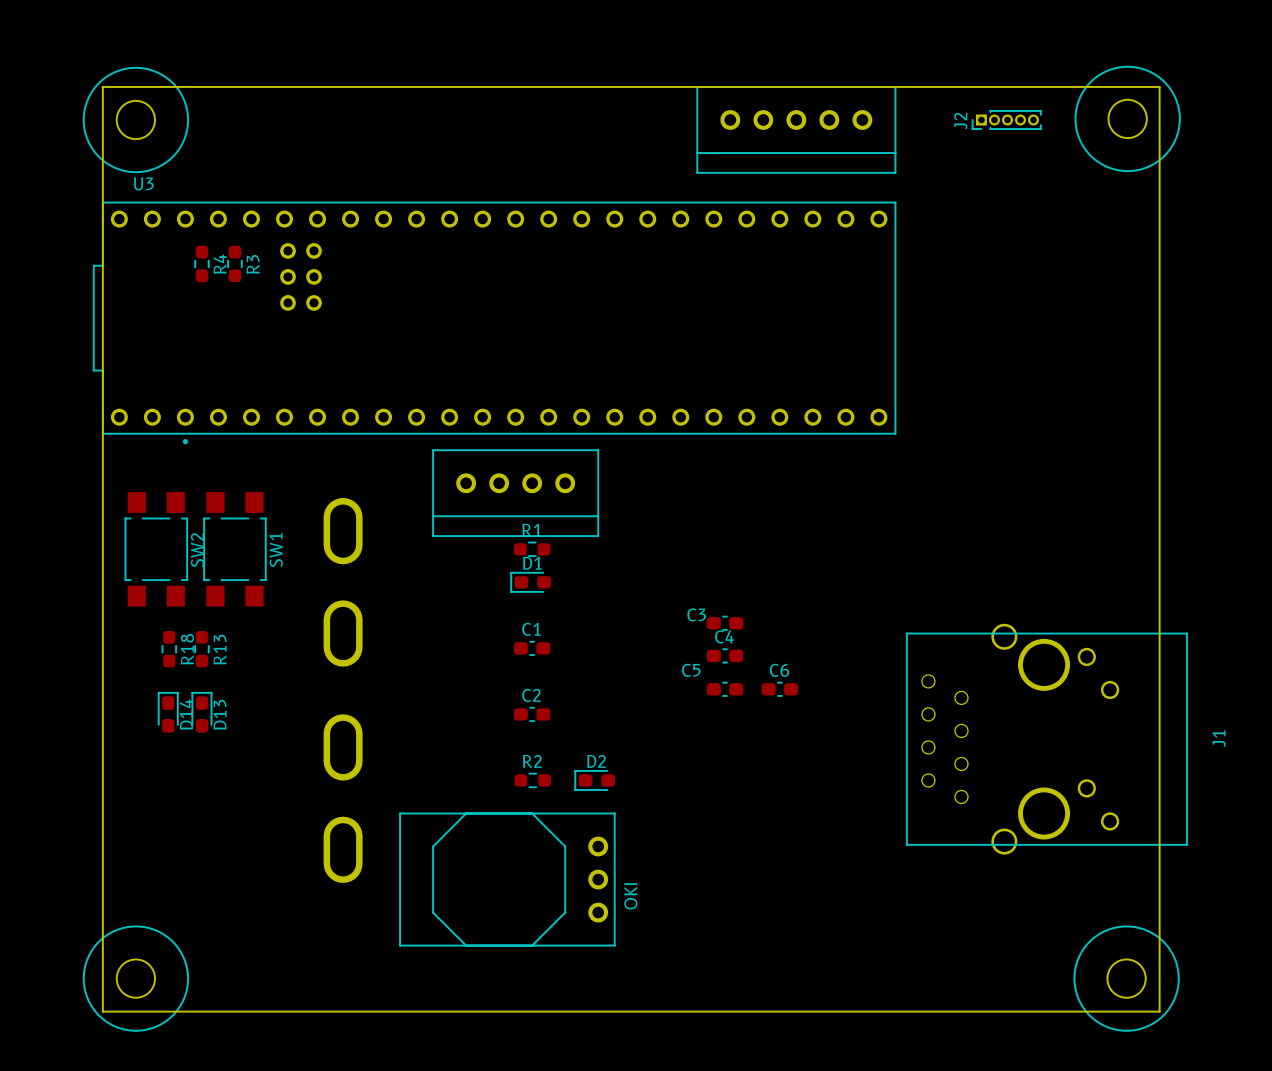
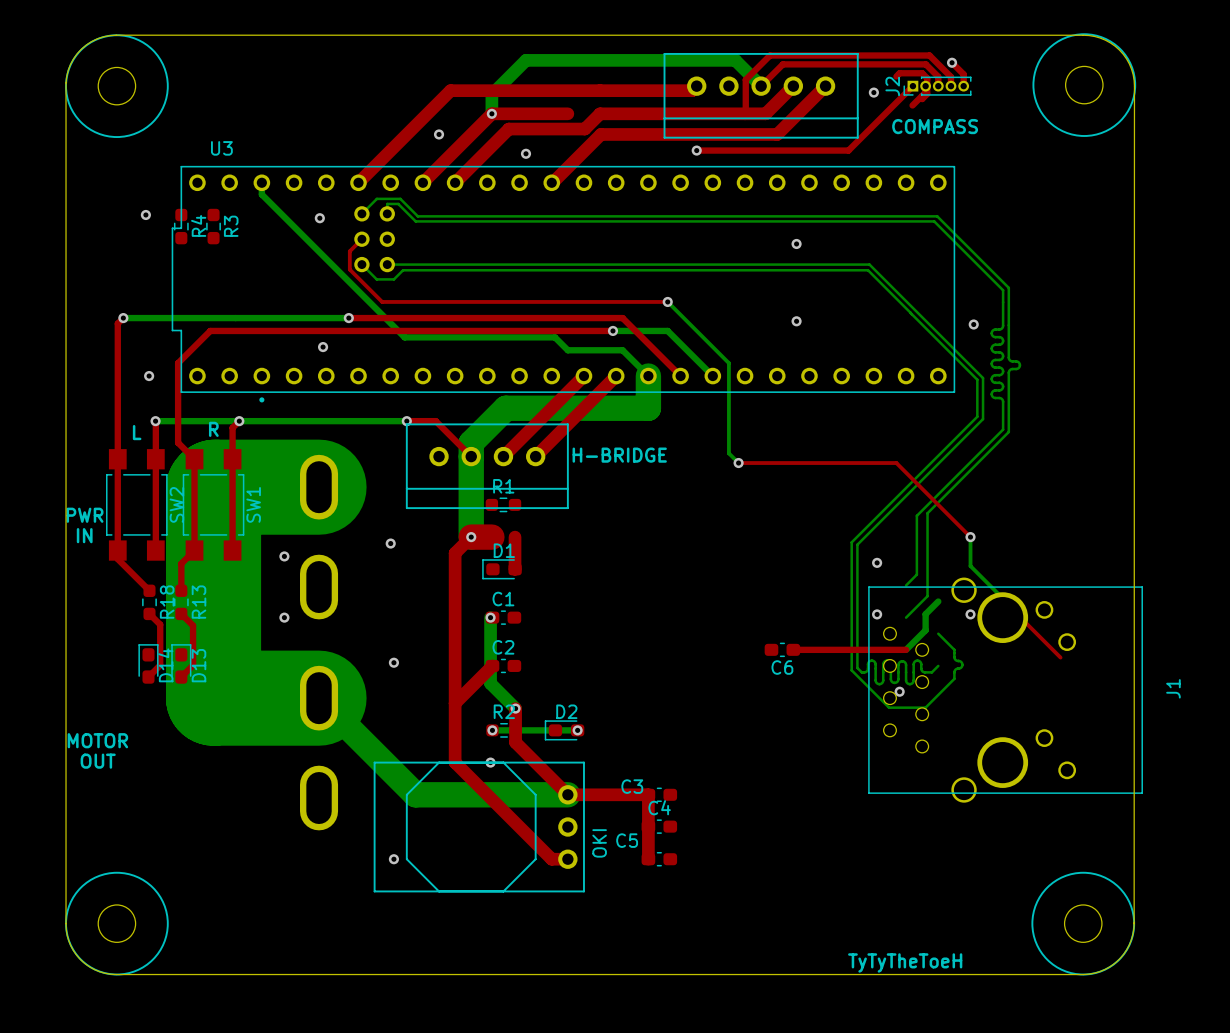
board edge: (102, 86) (1159, 86) (1159, 1011) (102, 1011) (102, 86) -> none
top track: none -> (952, 62) (963, 74) (963, 86)
via: none -> (952, 62)
top track: none -> (896, 76) (899, 73) (922, 73) (927, 78) (927, 94) (922, 99) (922, 95)
top track: none -> (696, 86) (692, 90) (450, 90) (358, 182)
top track: none -> (761, 86) (782, 64) (925, 64) (938, 76) (938, 86)
bottom track: none -> (761, 86) (735, 60) (526, 60) (491, 94) (491, 113)
top track: none -> (825, 86) (777, 134) (600, 134) (551, 182)
top track: none -> (912, 86) (848, 150) (696, 150)
top track: none -> (925, 86) (925, 92) (912, 105)
top track: none -> (950, 86) (950, 76) (929, 55) (770, 55) (745, 79) (745, 113)
J2 position: (1006, 120) -> (937, 86)
via: none -> (873, 92)
top track: none -> (777, 101) (793, 86) (765, 113) (600, 113) (584, 129) (508, 129) (455, 182)
via: none -> (491, 113)
top track: none -> (567, 113) (491, 113) (422, 182)
text: none -> COMPASS (935, 126)
via: none -> (439, 134)
via: none -> (696, 150)
via: none -> (526, 153)
bottom track: none -> (261, 182) (261, 194) (404, 337) (554, 337) (567, 350) (622, 350) (648, 376) (648, 408) (505, 408) (471, 442) (471, 537)
bottom track: none -> (361, 213) (376, 198) (400, 198) (417, 216) (937, 216) (1008, 287) (1008, 358) (1011, 361) (1018, 362) (1019, 365) (1008, 372) (1008, 431) (927, 513) (927, 596) (906, 617)
bottom track: none -> (387, 213) (387, 203) (398, 203) (415, 221) (934, 221) (1003, 290) (1002, 326) (1000, 329) (993, 330) (991, 333) (993, 336) (1000, 337) (1003, 340) (1001, 343) (994, 345) (991, 348) (993, 351) (1000, 352) (1002, 355) (1001, 359) (994, 360) (991, 363) (994, 367) (1001, 368) (1002, 372) (993, 375) (991, 378) (994, 382) (1001, 383) (1002, 387) (1000, 390) (993, 390) (991, 394) (993, 397) (1000, 398) (1002, 400) (1003, 429) (916, 515) (916, 574) (906, 585)
via: none -> (145, 214)
via: none -> (319, 218)
top track: none -> (361, 239) (349, 251) (349, 269) (382, 301) (667, 301)
via: none -> (796, 243)
bottom track: none -> (361, 264) (376, 279) (393, 279) (403, 270) (868, 270) (910, 312)
bottom track: none -> (387, 264) (869, 264) (983, 378) (983, 419) (857, 544) (857, 667) (861, 672) (865, 672) (868, 662) (874, 661) (875, 681) (880, 684) (883, 680) (883, 662) (888, 660) (890, 663) (890, 680) (895, 682) (898, 679) (898, 663) (903, 661) (906, 664) (906, 681) (909, 684) (913, 681) (913, 663) (915, 661) (920, 662) (921, 670) (924, 672) (931, 672) (938, 665)
U3 position: (494, 322) -> (563, 284)
bottom track: none -> (667, 301) (728, 363) (728, 453) (738, 463)
via: none -> (667, 301)
bottom track: none -> (910, 312) (977, 379) (977, 416) (851, 542) (851, 670) (889, 707) (925, 707) (954, 678) (954, 670) (962, 665) (960, 661) (954, 659) (954, 649) (938, 633)
top track: none -> (123, 318) (117, 323) (117, 559) (149, 590)
bottom track: none -> (123, 318) (348, 318)
via: none -> (123, 318)
top track: none -> (348, 318) (622, 318) (680, 376)
via: none -> (348, 318)
via: none -> (796, 321)
via: none -> (973, 324)
top track: none -> (612, 330) (210, 330) (178, 363) (178, 442) (194, 459) (194, 550) (181, 563) (181, 590)
bottom track: none -> (612, 330) (667, 330) (712, 376)
via: none -> (612, 330)
via: none -> (323, 347)
via: none -> (149, 376)
top track: none -> (583, 376) (503, 456)
top track: none -> (616, 376) (535, 456)
top track: none -> (155, 421) (155, 550)
bottom track: none -> (155, 421) (406, 421)
via: none -> (155, 421)
top track: none -> (239, 421) (232, 427) (232, 550)
via: none -> (239, 421)
top track: none -> (406, 421) (435, 421) (471, 456)
via: none -> (406, 421)
text: none -> R (213, 429)
text: none -> L (137, 432)
part position: (515, 493) -> (487, 466)
text: none -> H-BRIDGE (619, 455)
top track: none -> (738, 463) (896, 463) (970, 537)
via: none -> (738, 463)
bottom track: none -> (319, 487) (215, 487) (213, 488) (213, 698) (319, 698) (415, 794) (567, 794)
text: none -> PWR (85, 515)
text: none -> IN (84, 535)
via: none -> (471, 537)
top track: none -> (491, 537) (471, 537) (455, 553) (455, 762) (551, 859) (567, 859)
D1 position: (530, 582) -> (501, 569)
top track: none -> (515, 537) (515, 569)
bottom track: none -> (970, 537) (970, 566) (1005, 601)
via: none -> (970, 537)
via: none -> (390, 543)
via: none -> (284, 556)
via: none -> (877, 562)
C3 position: (725, 623) -> (659, 794)
C1 position: (532, 648) -> (503, 617)
bottom track: none -> (938, 601) (925, 614) (925, 630) (906, 649)
top track: none -> (1005, 601) (1060, 657)
C4 position: (725, 655) -> (659, 826)
top track: none -> (149, 613) (160, 624) (160, 665) (148, 677)
top track: none -> (181, 613) (193, 625) (193, 665) (181, 677)
via: none -> (877, 614)
via: none -> (970, 614)
via: none -> (284, 617)
bottom track: none -> (490, 617) (490, 683) (515, 708)
via: none -> (490, 617)
C6 name position: C6 (779, 670) -> C6 (782, 667)
C5 position: (725, 689) -> (659, 859)
C6 position: (779, 689) -> (782, 649)
top track: none -> (793, 649) (906, 649)
via: none -> (393, 662)
top track: none -> (492, 665) (455, 703)
via: none -> (899, 691)
top track: none -> (515, 708) (515, 742) (567, 794) (648, 794) (648, 859)
via: none -> (515, 708)
bottom track: none -> (492, 730) (577, 730)
via: none -> (492, 730)
via: none -> (577, 730)
text: none -> MOTOR (97, 740)
text: none -> OUT (98, 761)
via: none -> (490, 762)
via: none -> (393, 859)
board edge: none -> (1134, 922) (1131, 939) (1119, 959) (1100, 971) (1083, 974) (116, 974) (99, 971) (84, 963) (70, 945) (66, 923) (66, 82) (68, 70) (77, 53) (91, 41) (103, 36) (116, 35) (1083, 35) (1100, 38) (1115, 46) (1129, 63) (1134, 86) (1134, 923)
text: none -> TyTyTheToeH (905, 962)

